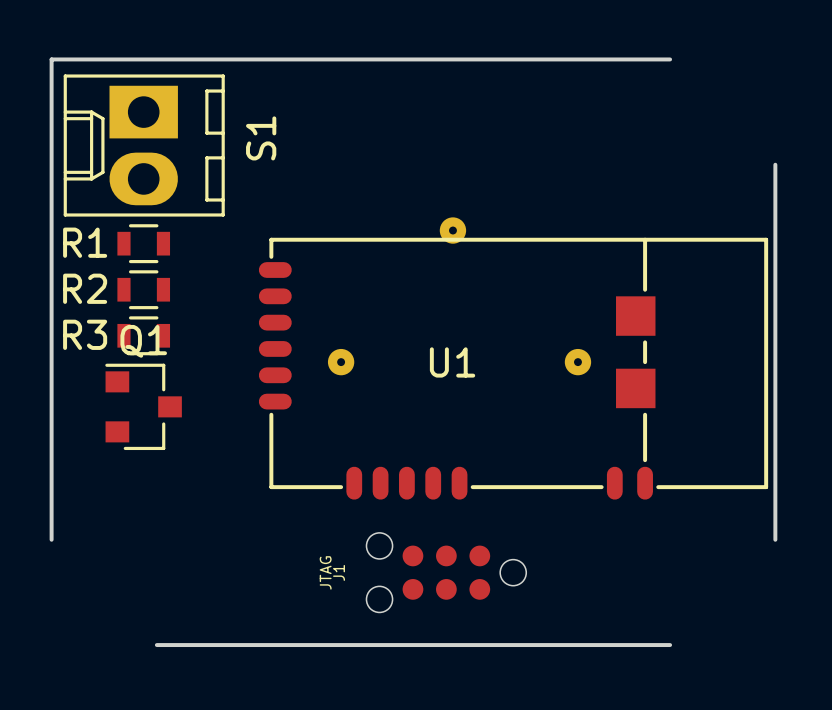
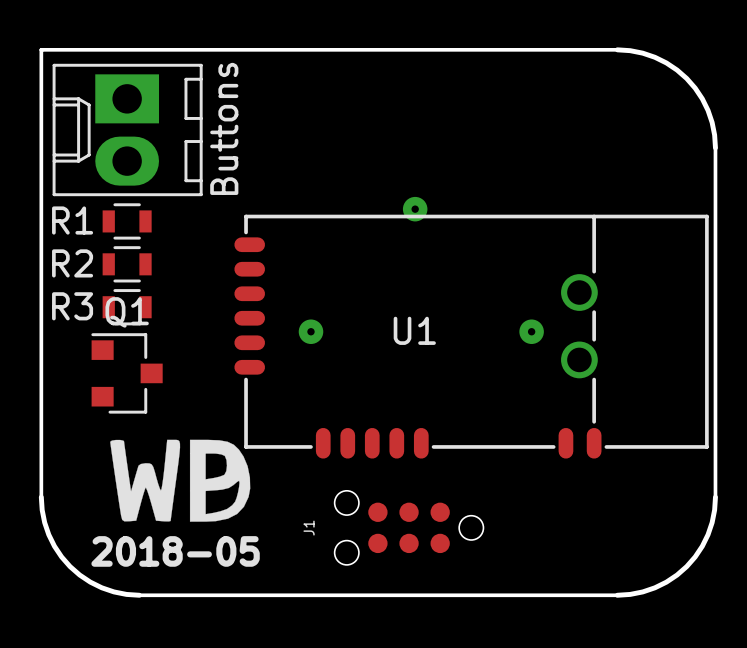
board edge: none -> (617, 49) (630, 50) (654, 57) (666, 62) (686, 78) (702, 98) (708, 110) (714, 135) (715, 147)
S1 name: S1 (261, 138) -> Buttons (224, 128)
U1 footprint: [258, 237, 769, 500] -> [234, 214, 709, 459]
drawing: none -> [110, 439, 251, 522]
board edge: none -> (41, 497) (42, 510) (48, 534) (54, 546) (70, 566) (90, 582) (101, 587) (126, 594) (139, 595)
board edge: none -> (715, 497) (714, 510) (708, 534) (702, 546) (686, 566) (666, 582) (654, 587) (630, 594) (617, 595)
J1 value: JTAG (325, 572) -> none
text: none -> 2018-05 (175, 551)

